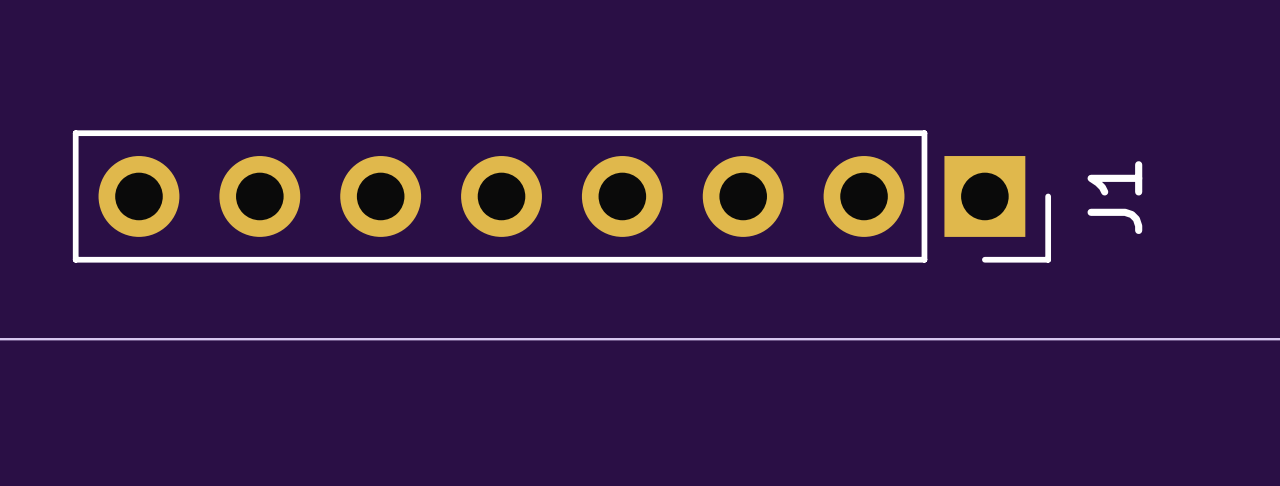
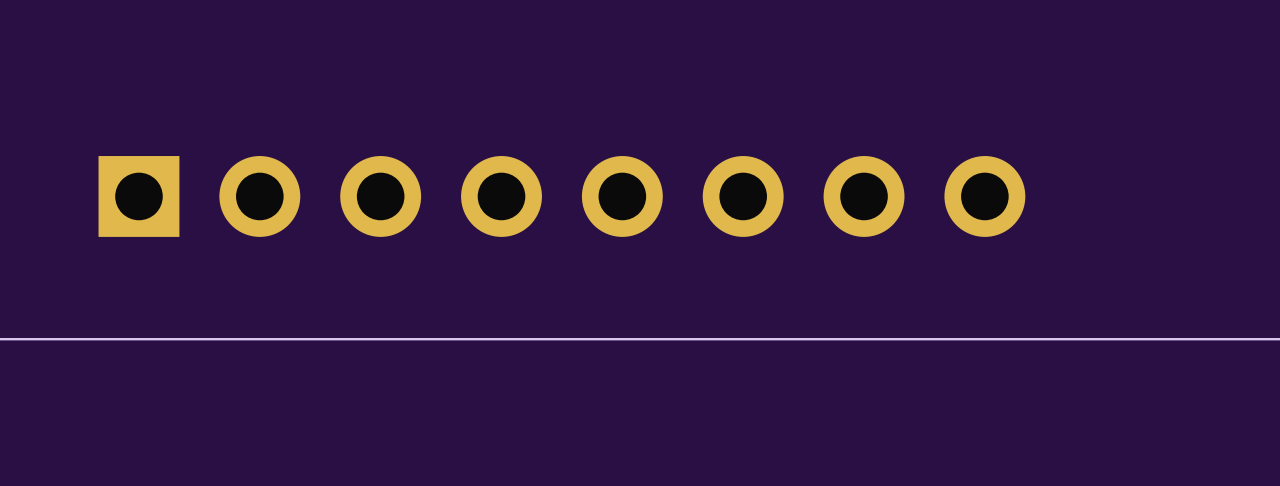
J1 side: top (561, 196) -> bottom (561, 196)

